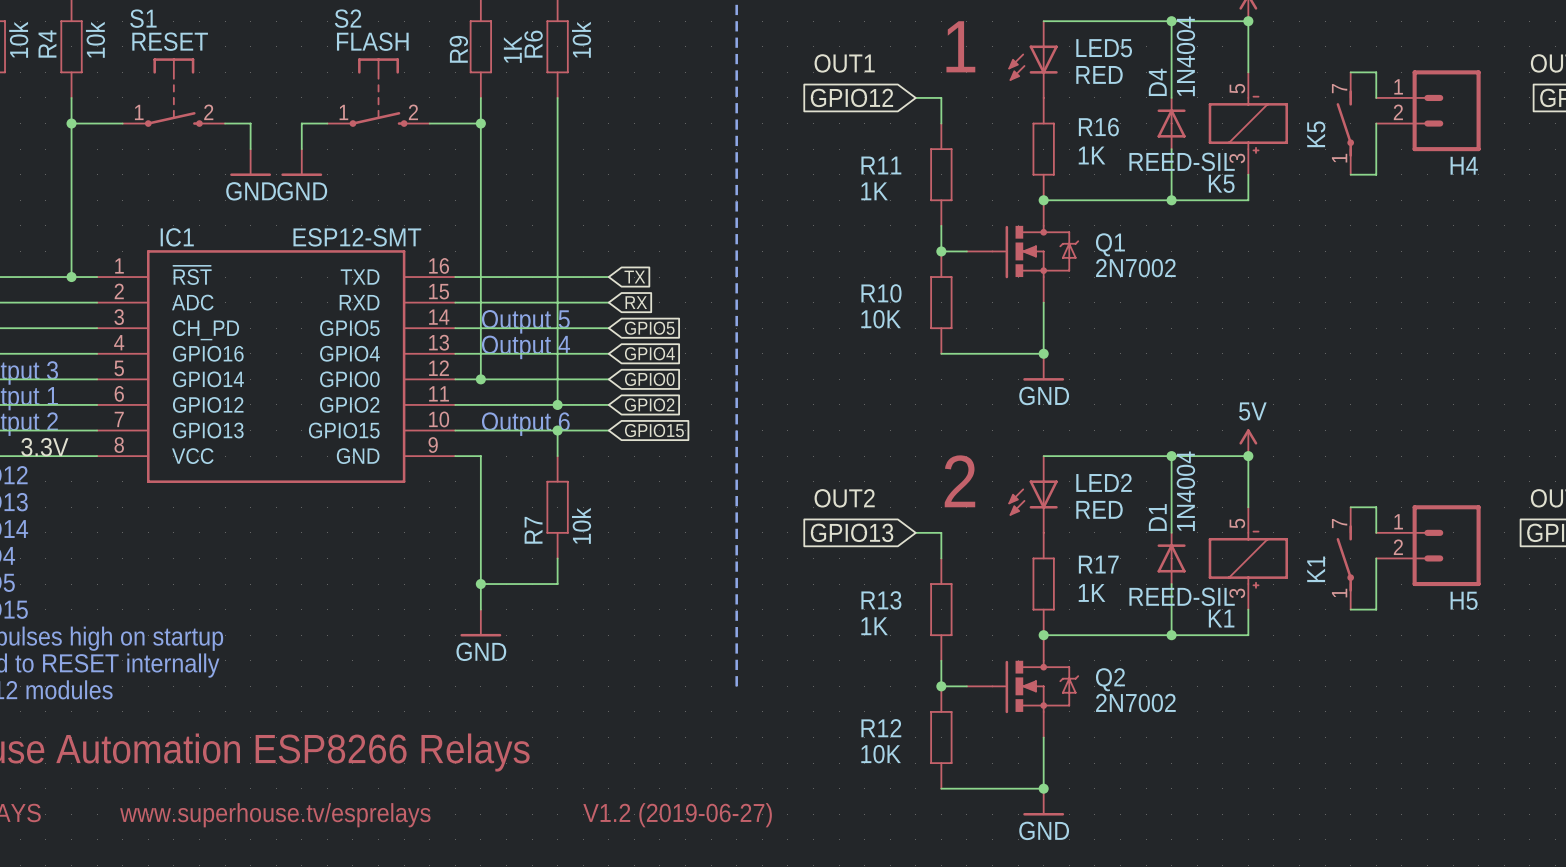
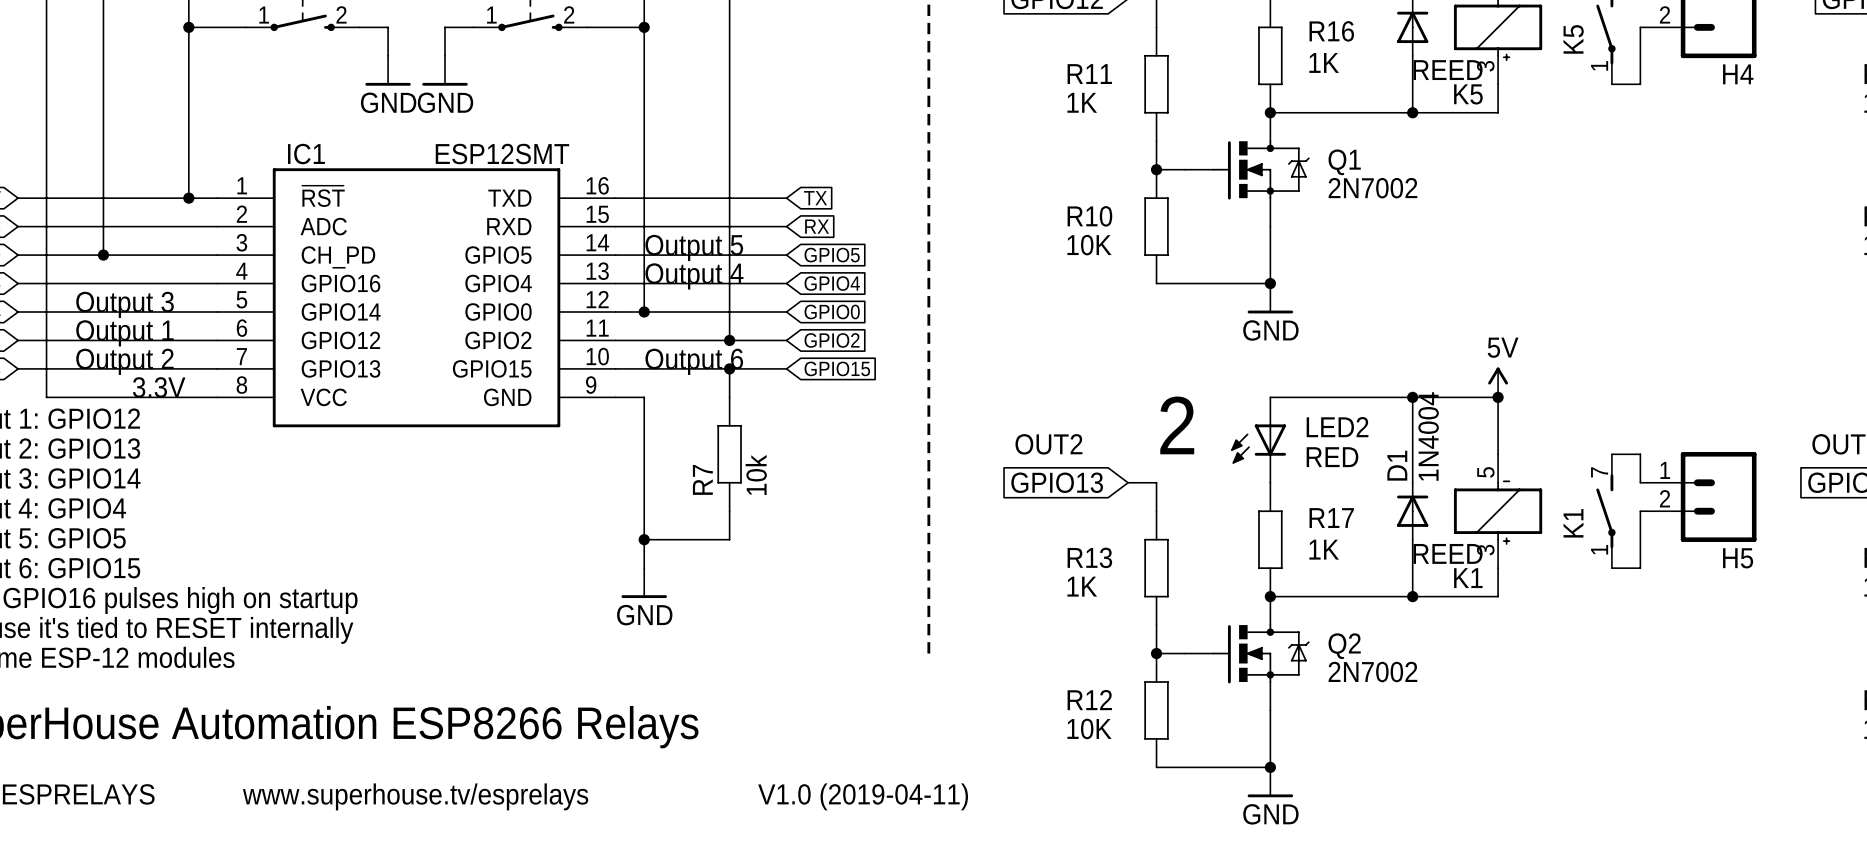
K5 value: REED-SIL (1182, 161) -> REED (1448, 70)
IC1 value: ESP12-SMT (357, 237) -> ESP12SMT (502, 154)
K1 value: REED-SIL (1182, 596) -> REED (1448, 553)
text: V1.2 (2019-06-27) (677, 815) -> V1.0 (2019-04-11) (863, 796)

